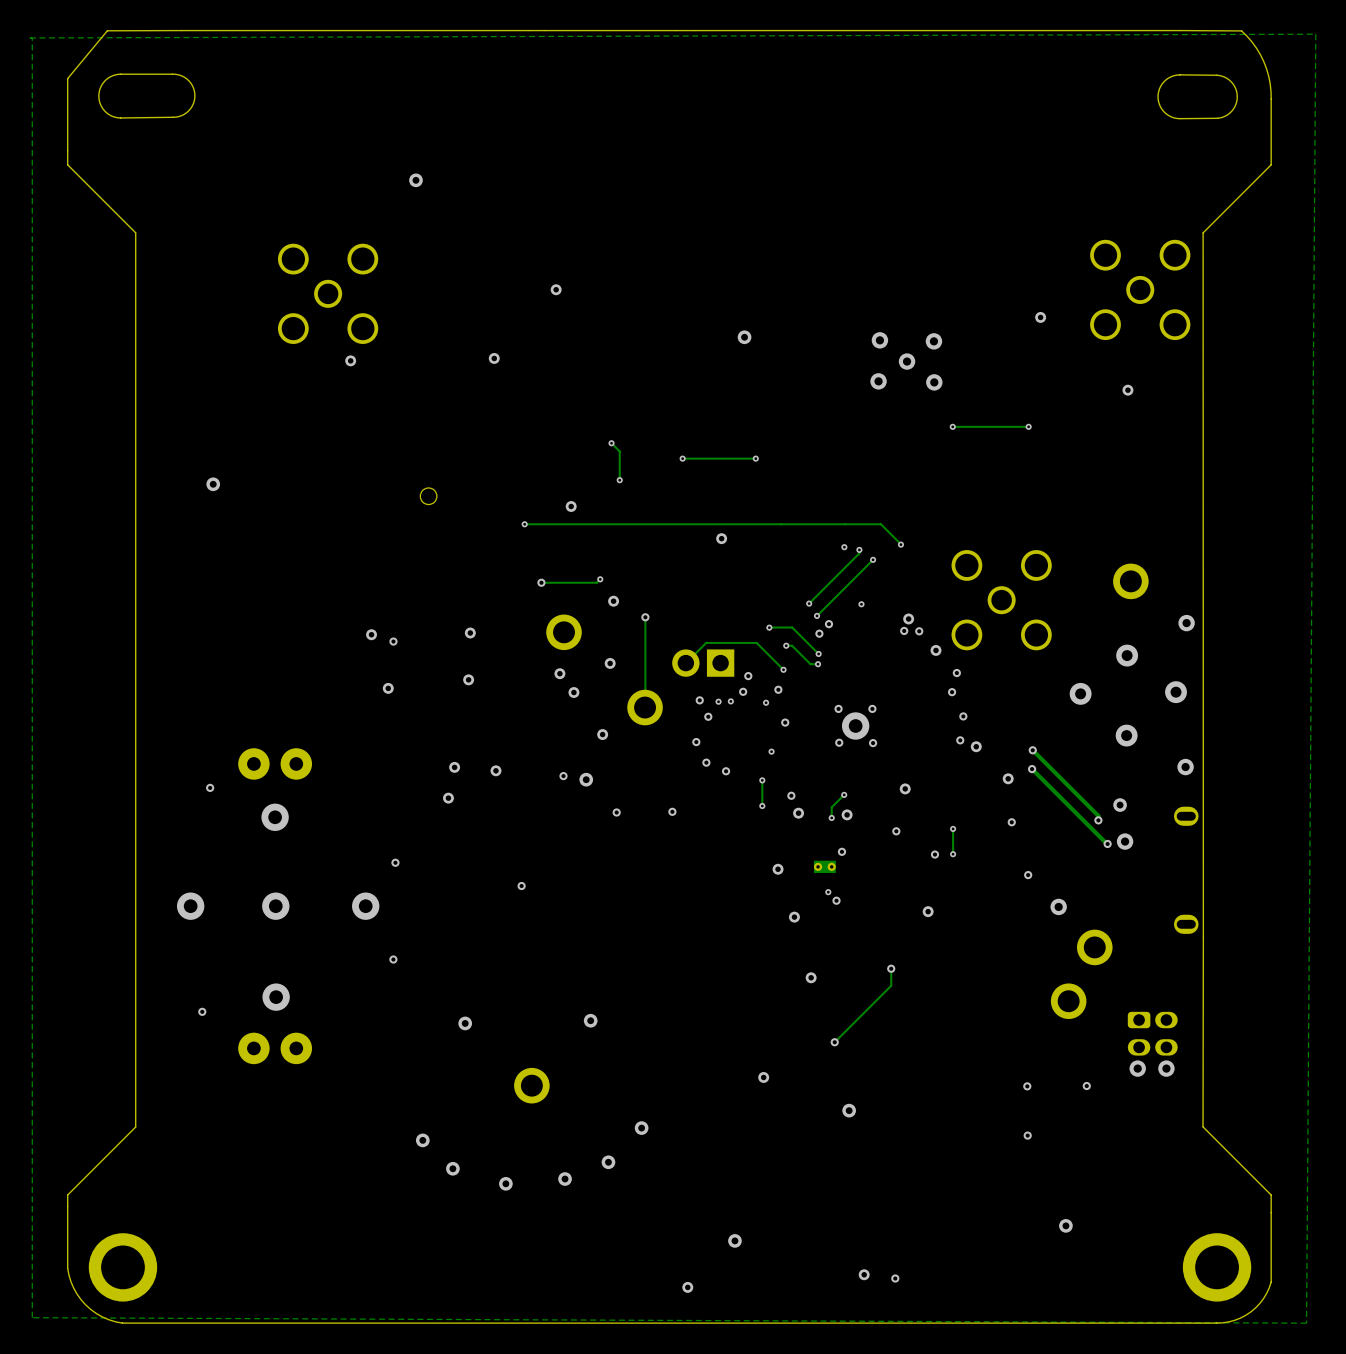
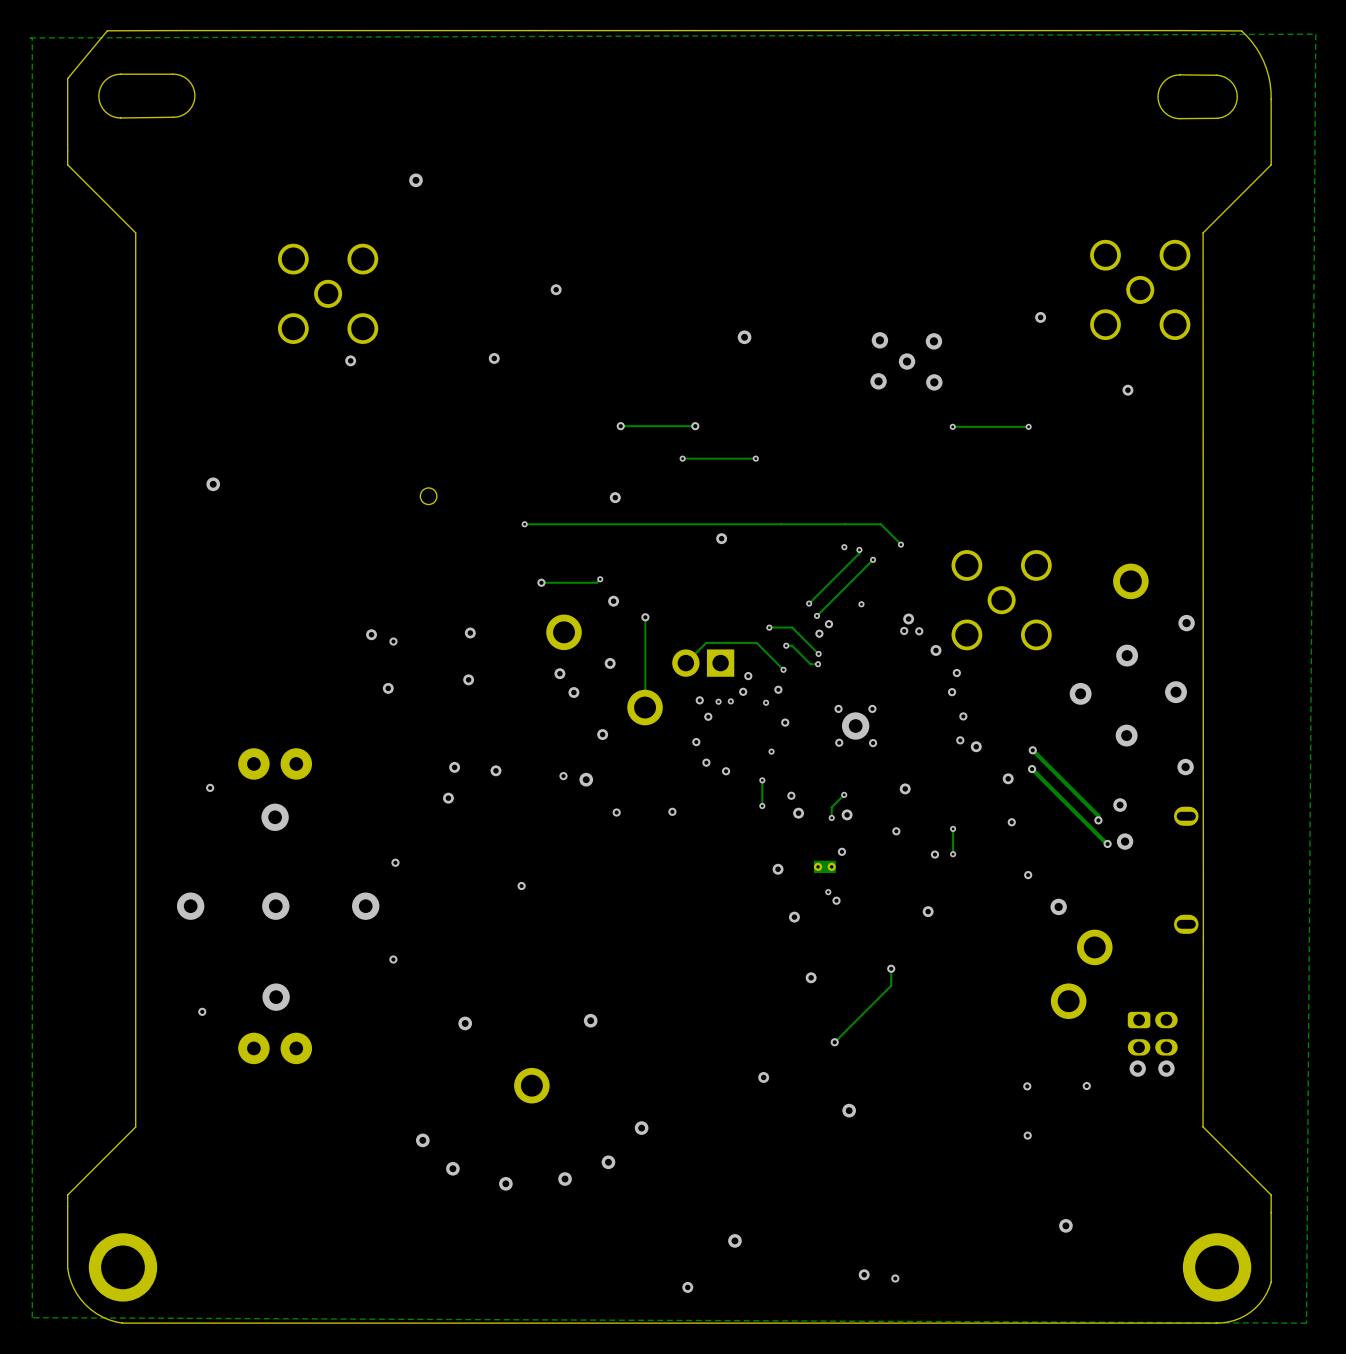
via: none -> (620, 426)
track: none -> (695, 426) (620, 426)
via: none -> (695, 426)
track: (611, 443) (619, 451) (619, 480) -> none
via: (611, 443) -> none
via: (619, 480) -> none
via position: (571, 506) -> (615, 497)

